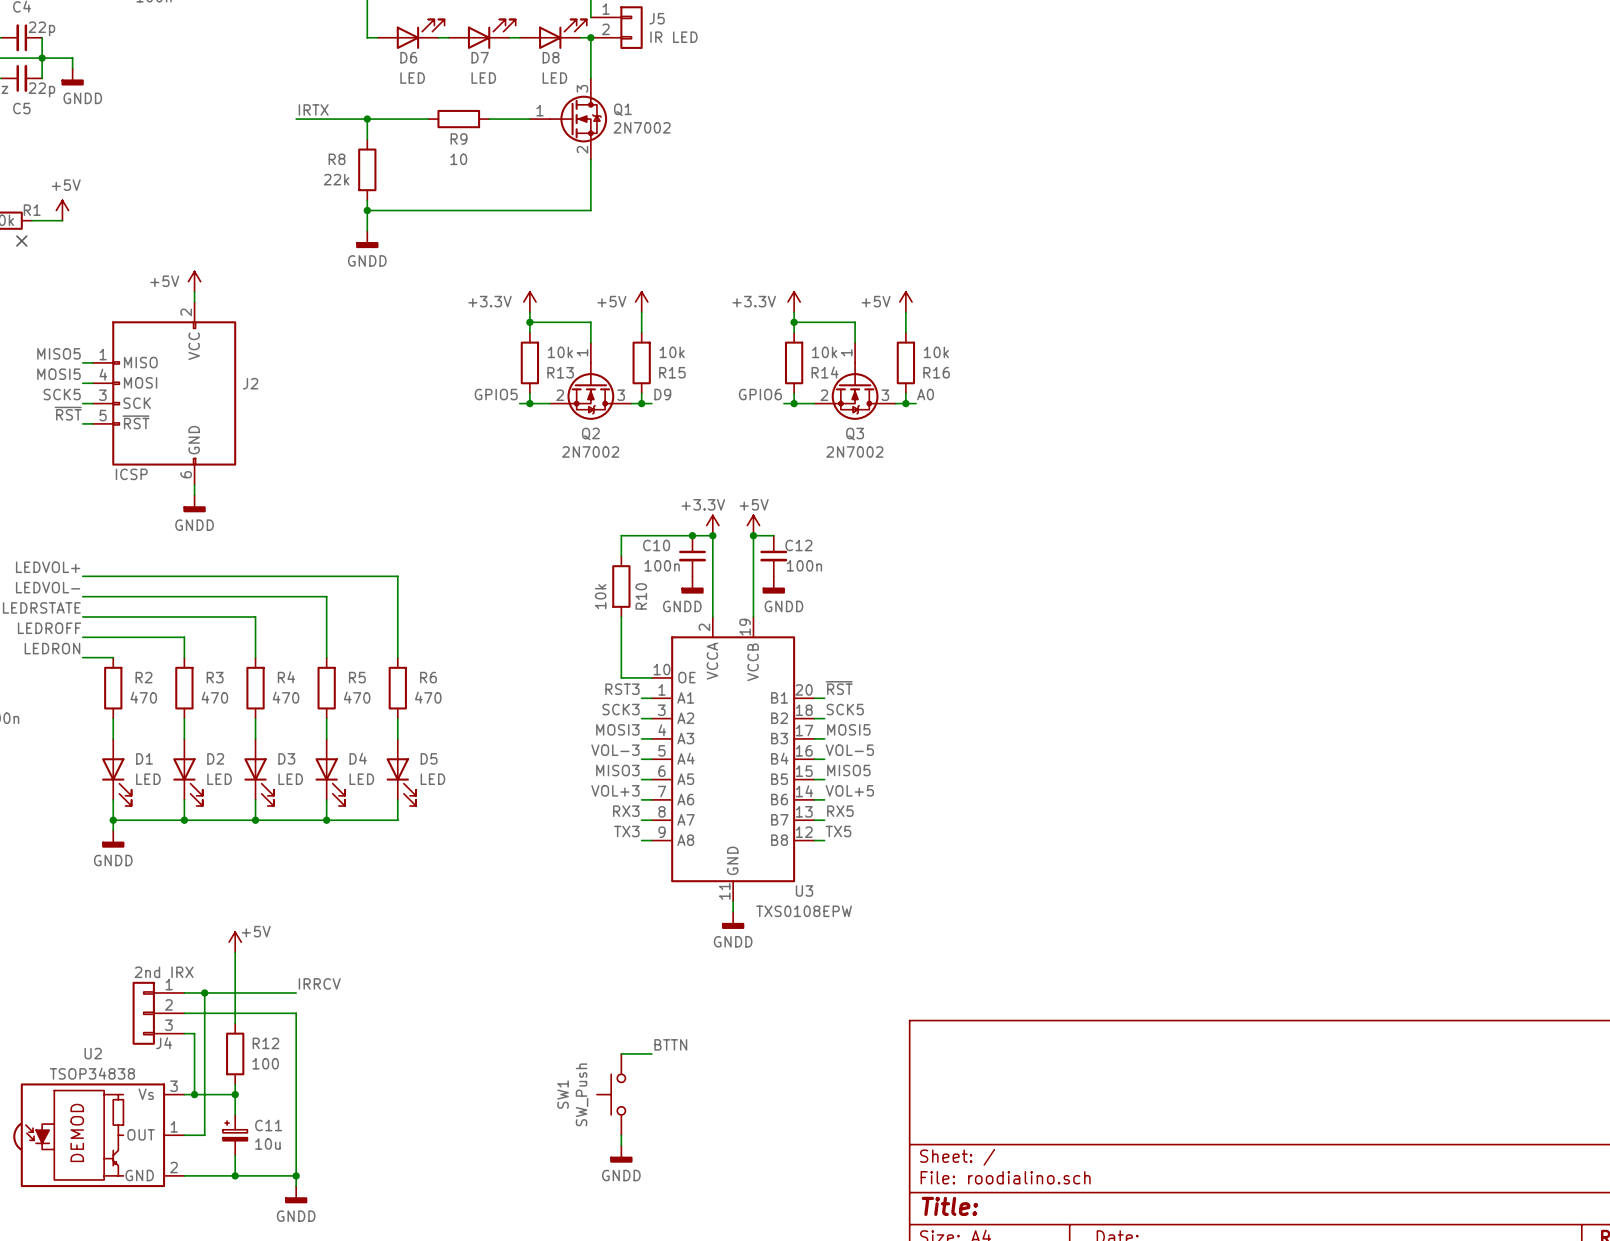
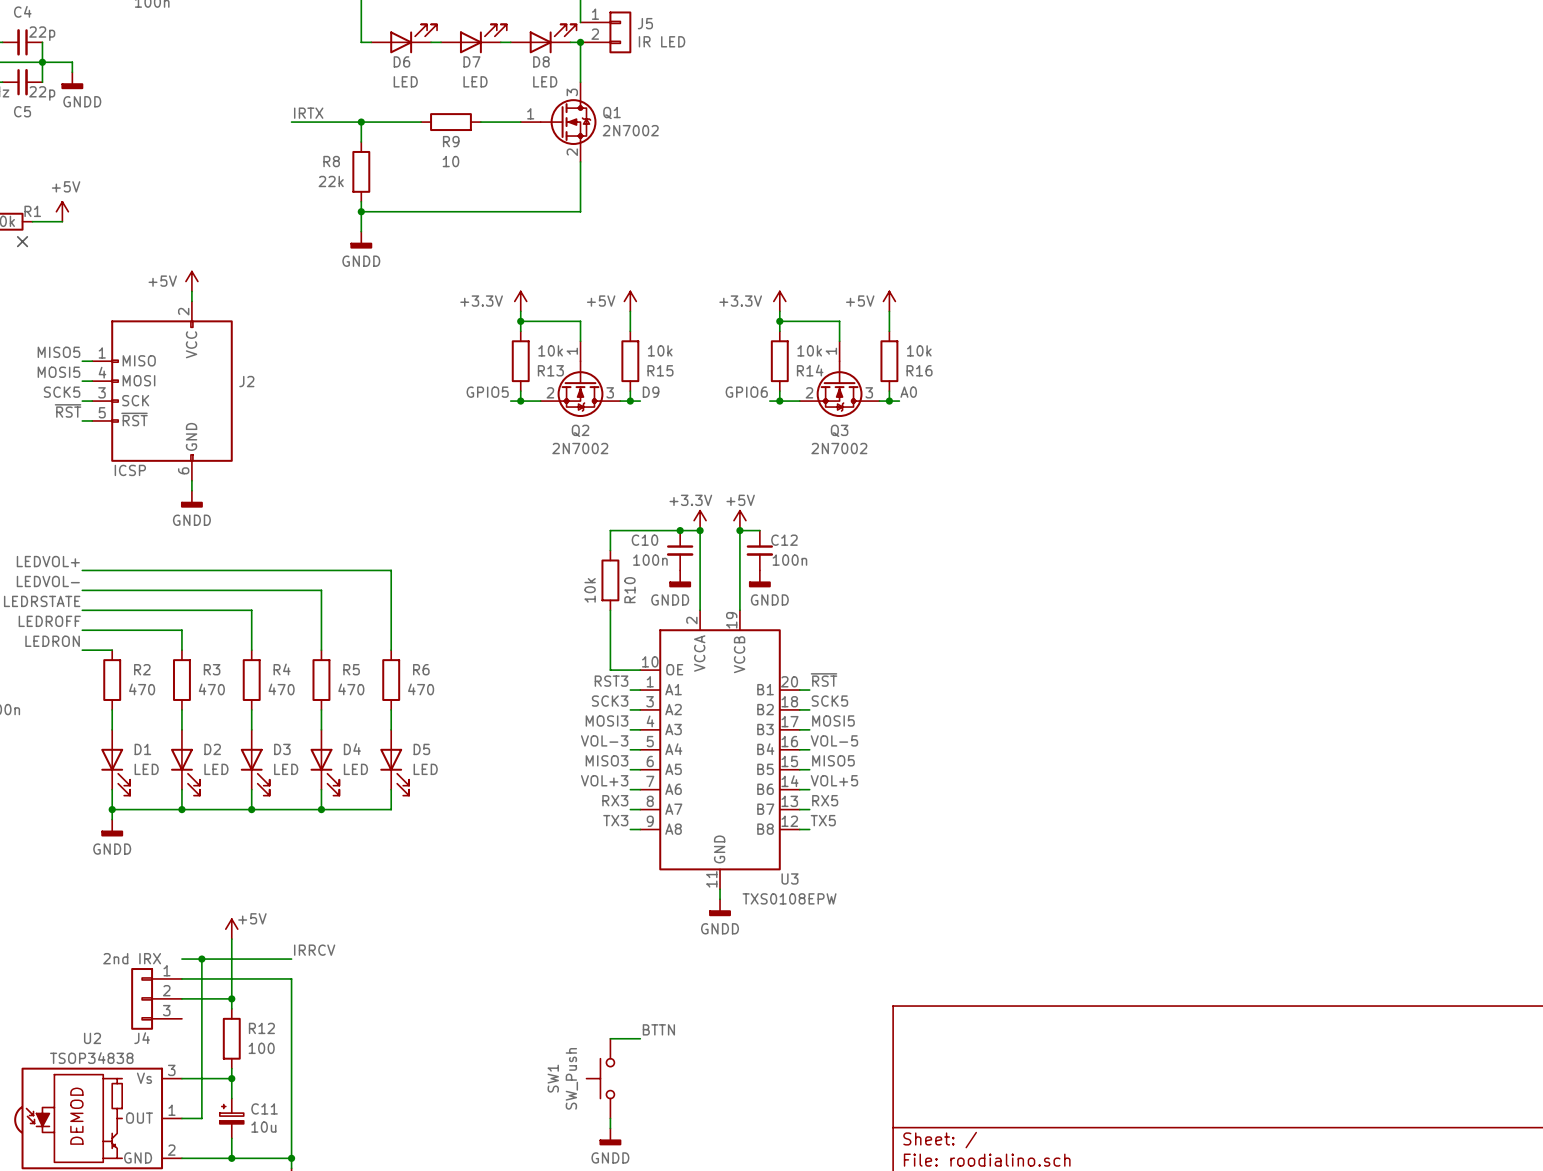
J4 value position: 2nd IRX (164, 972) -> 2nd IRX (132, 958)
wire: none -> (181, 959) (291, 959)
wire: none -> (201, 959) (201, 978)
junction: none -> (201, 959)
label position: IRRCV (319, 983) -> IRRCV (314, 950)
junction: (204, 992) -> none
wire: (235, 1013) (296, 1013) -> (291, 978) (291, 998)
junction: none -> (231, 998)
wire: (184, 1033) (194, 1033) (194, 1094) -> none
J4 name position: J4 (164, 1043) -> J4 (142, 1038)
junction: (194, 1094) -> none

